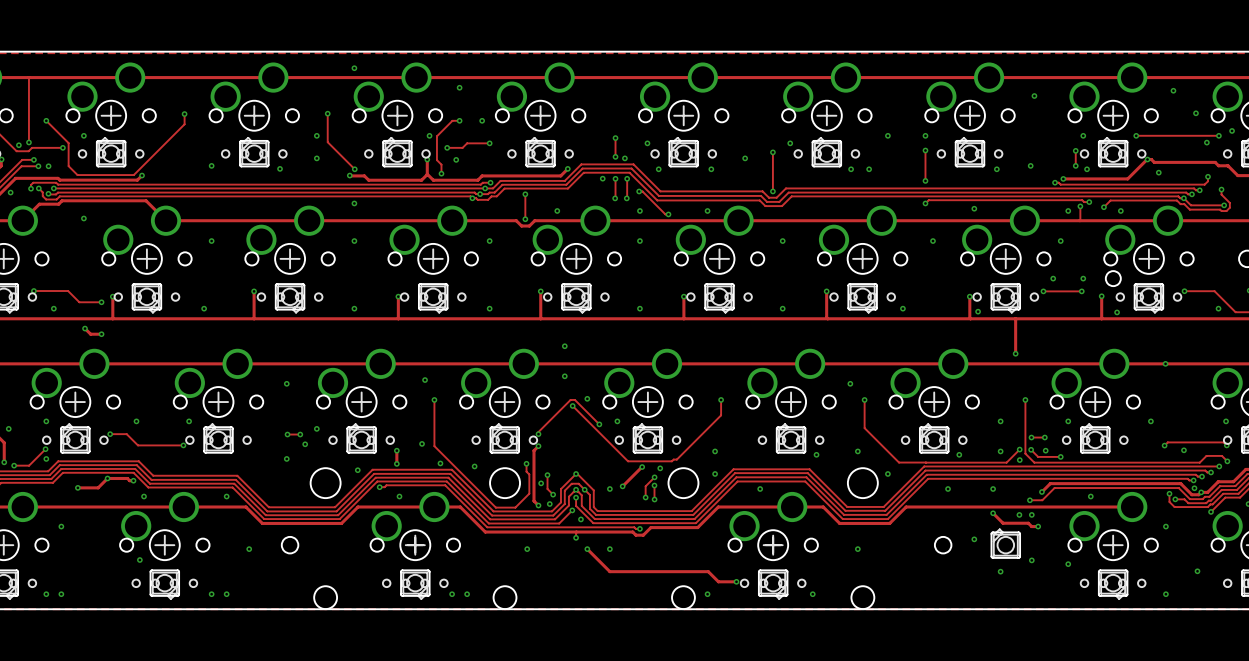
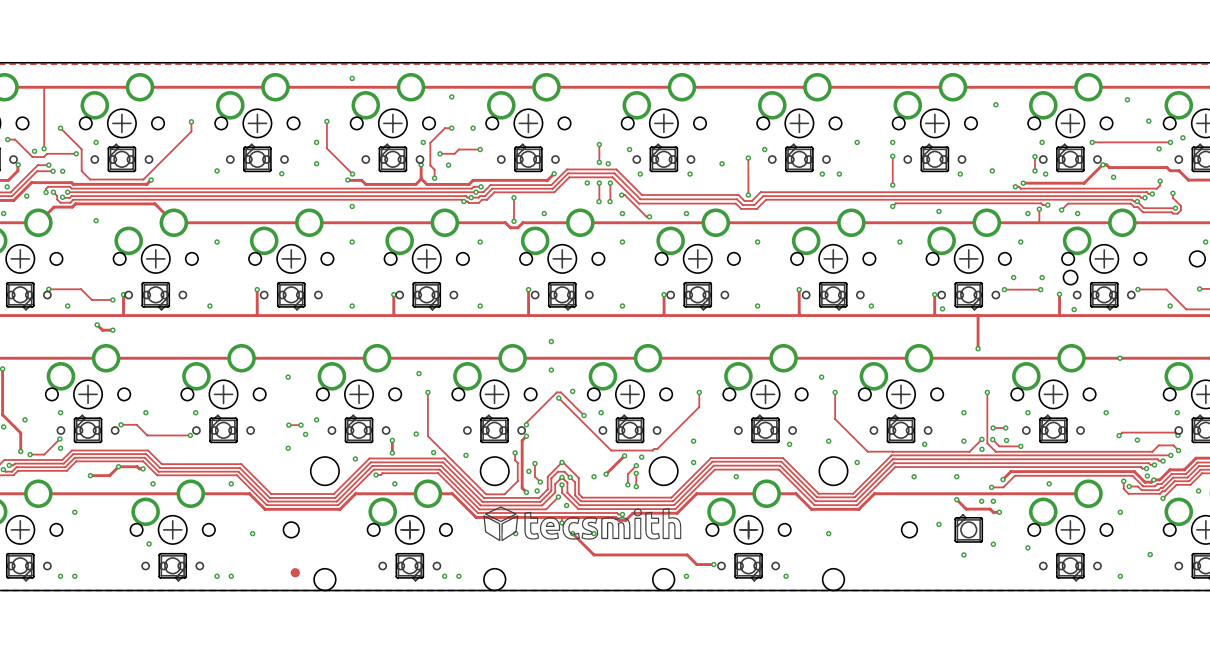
drawing: none -> [483, 506, 682, 542]
drawing: none -> [290, 568, 300, 578]

